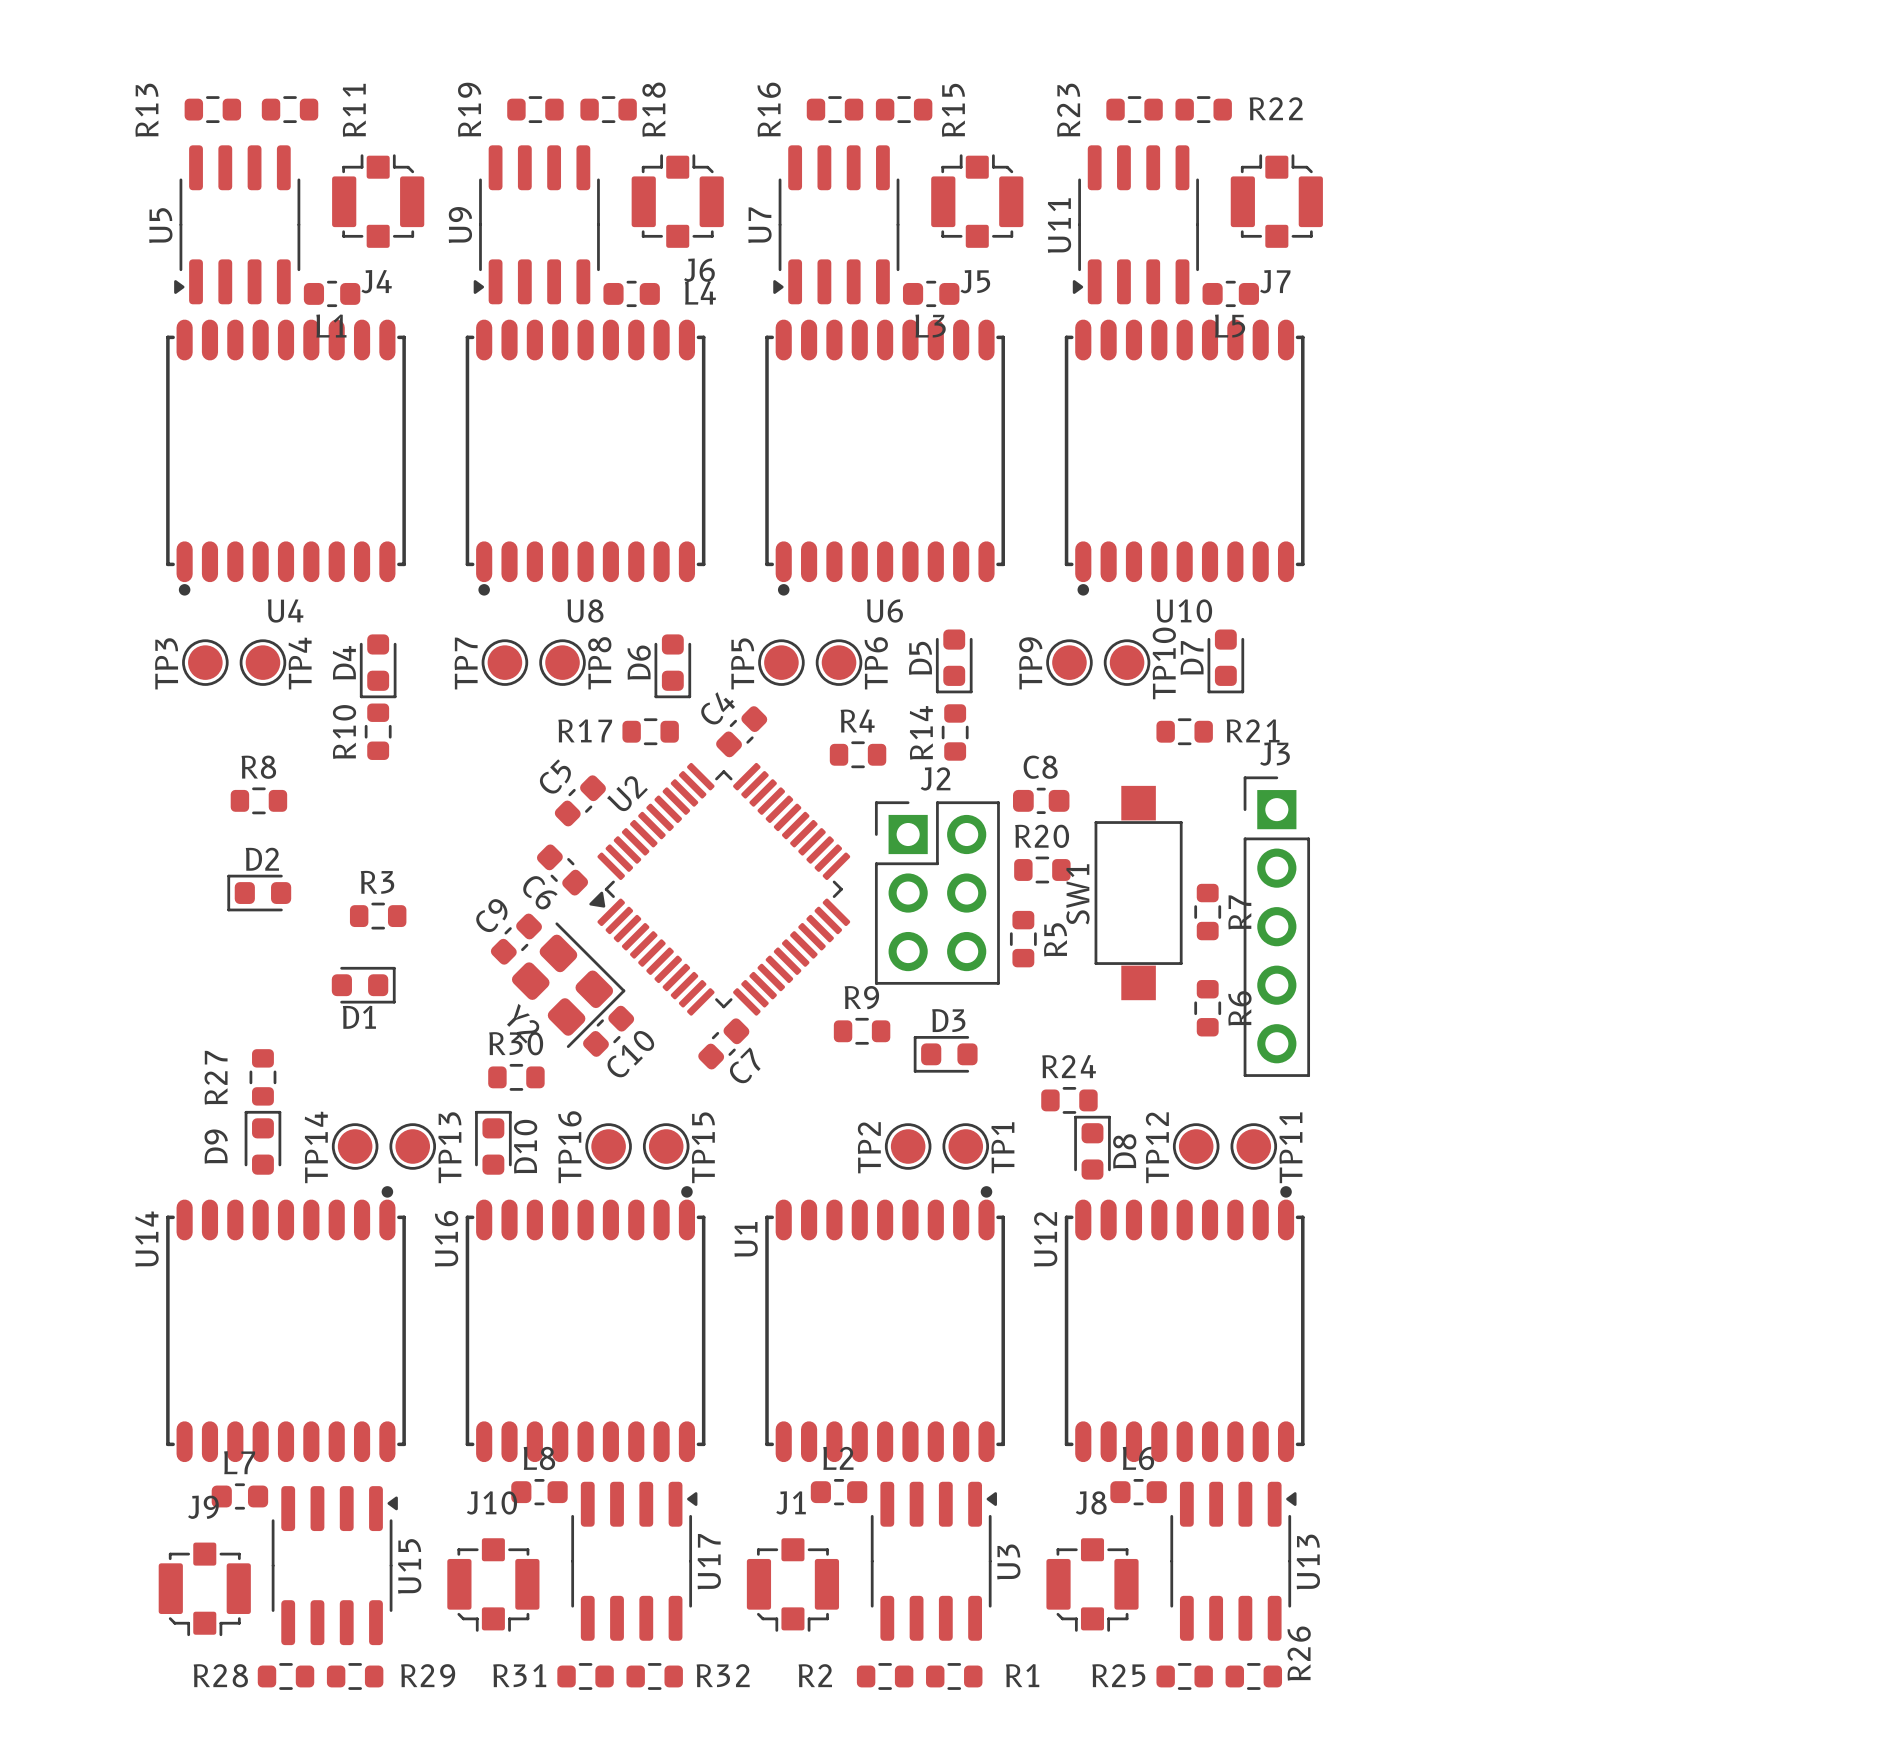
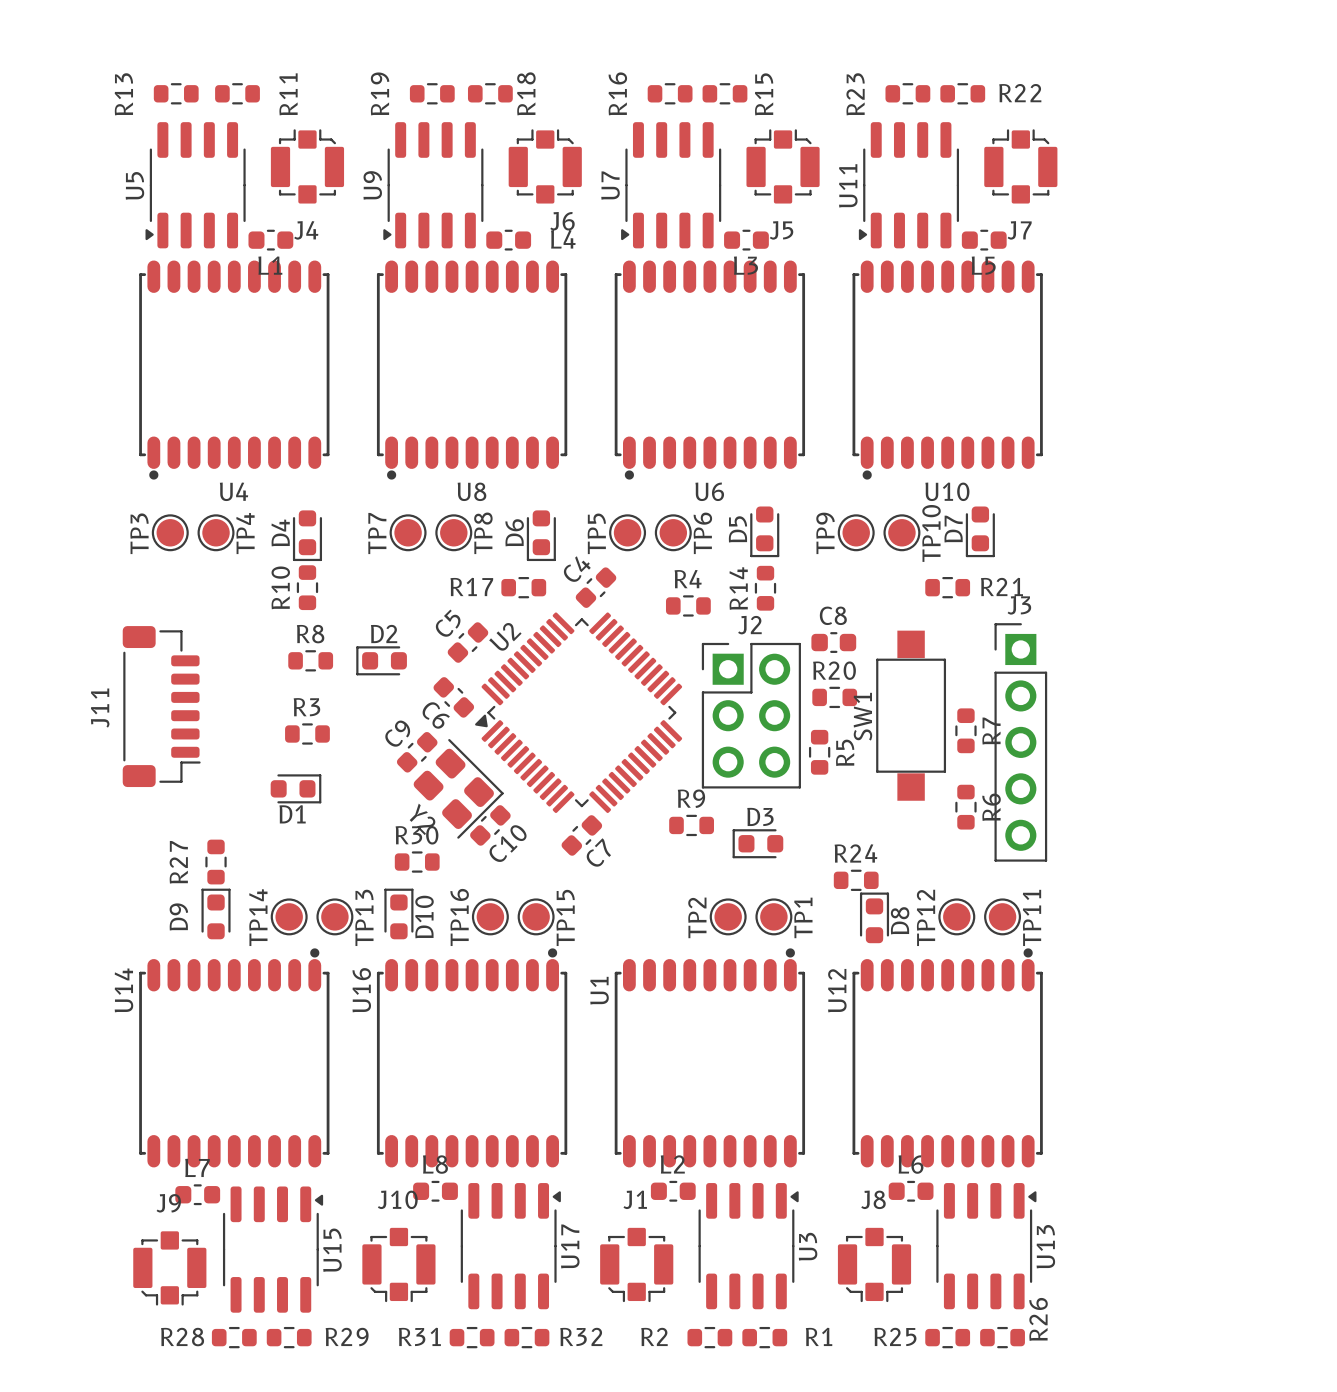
R8 position: (258, 800) -> (310, 660)
J11: none -> (161, 706)
D2 position: (259, 893) -> (381, 660)

